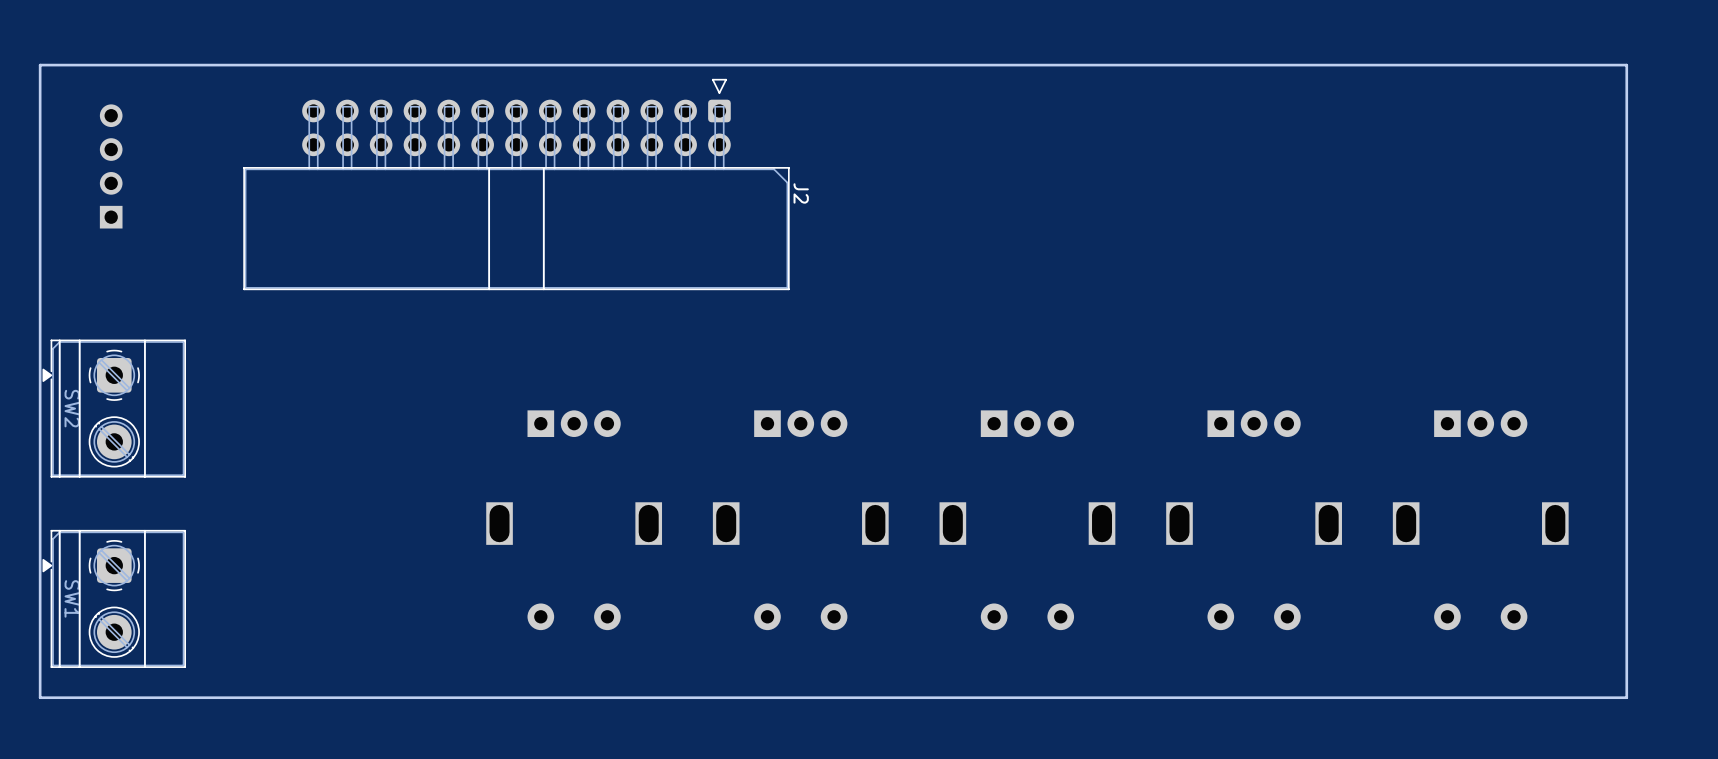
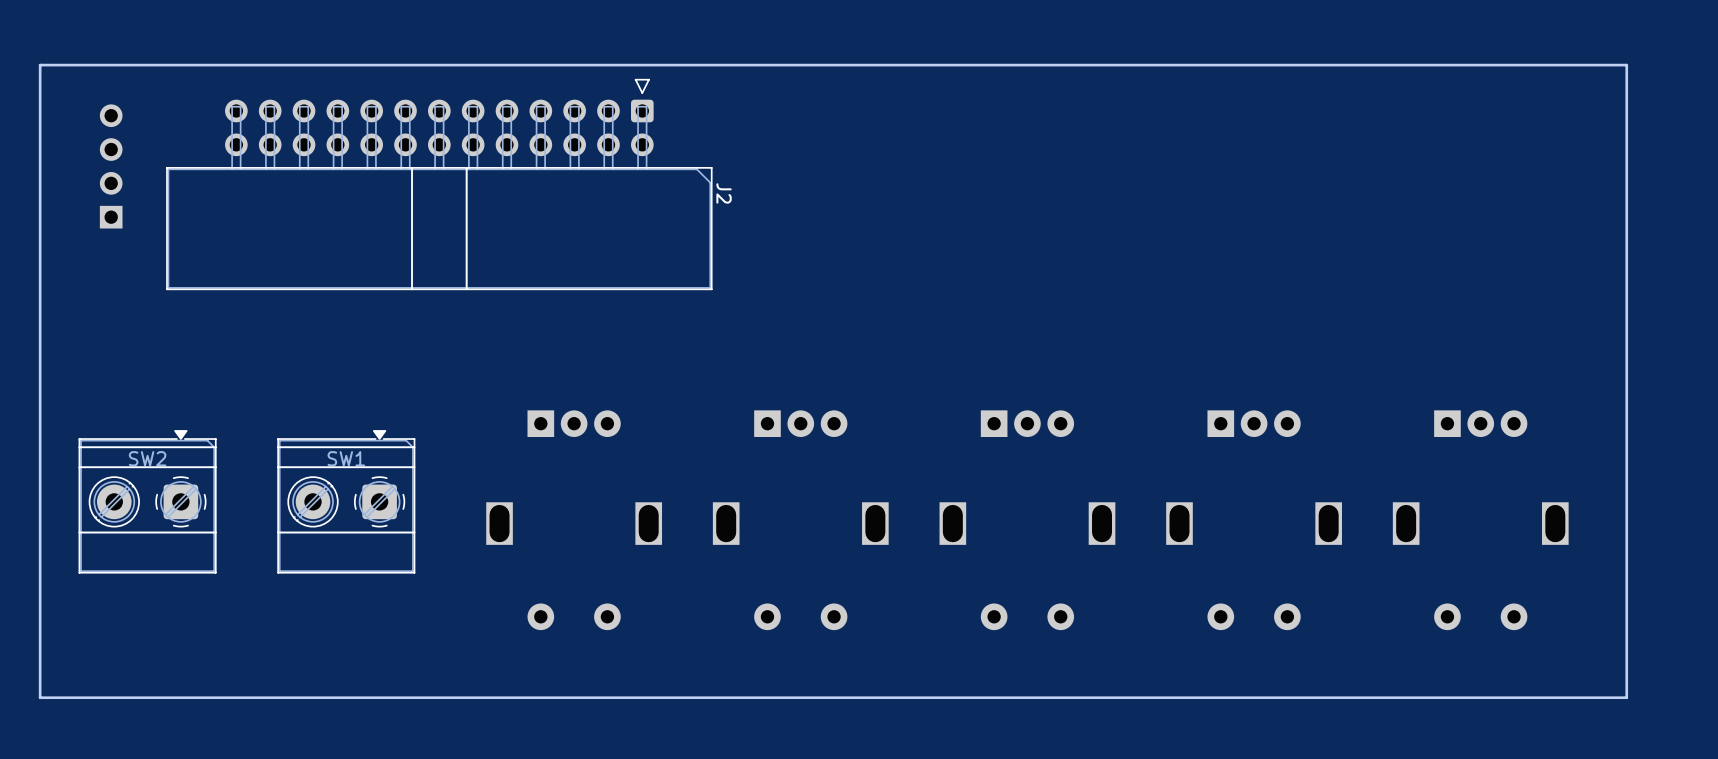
J2 position: (516, 184) -> (439, 184)
SW2 footprint: [42, 339, 186, 478] -> [78, 430, 217, 574]
SW2 name position: SW2 (72, 408) -> SW2 (147, 458)
SW1 rotation: 0° (114, 598) -> 90° clockwise (346, 501)
SW1 position: (114, 598) -> (346, 501)

